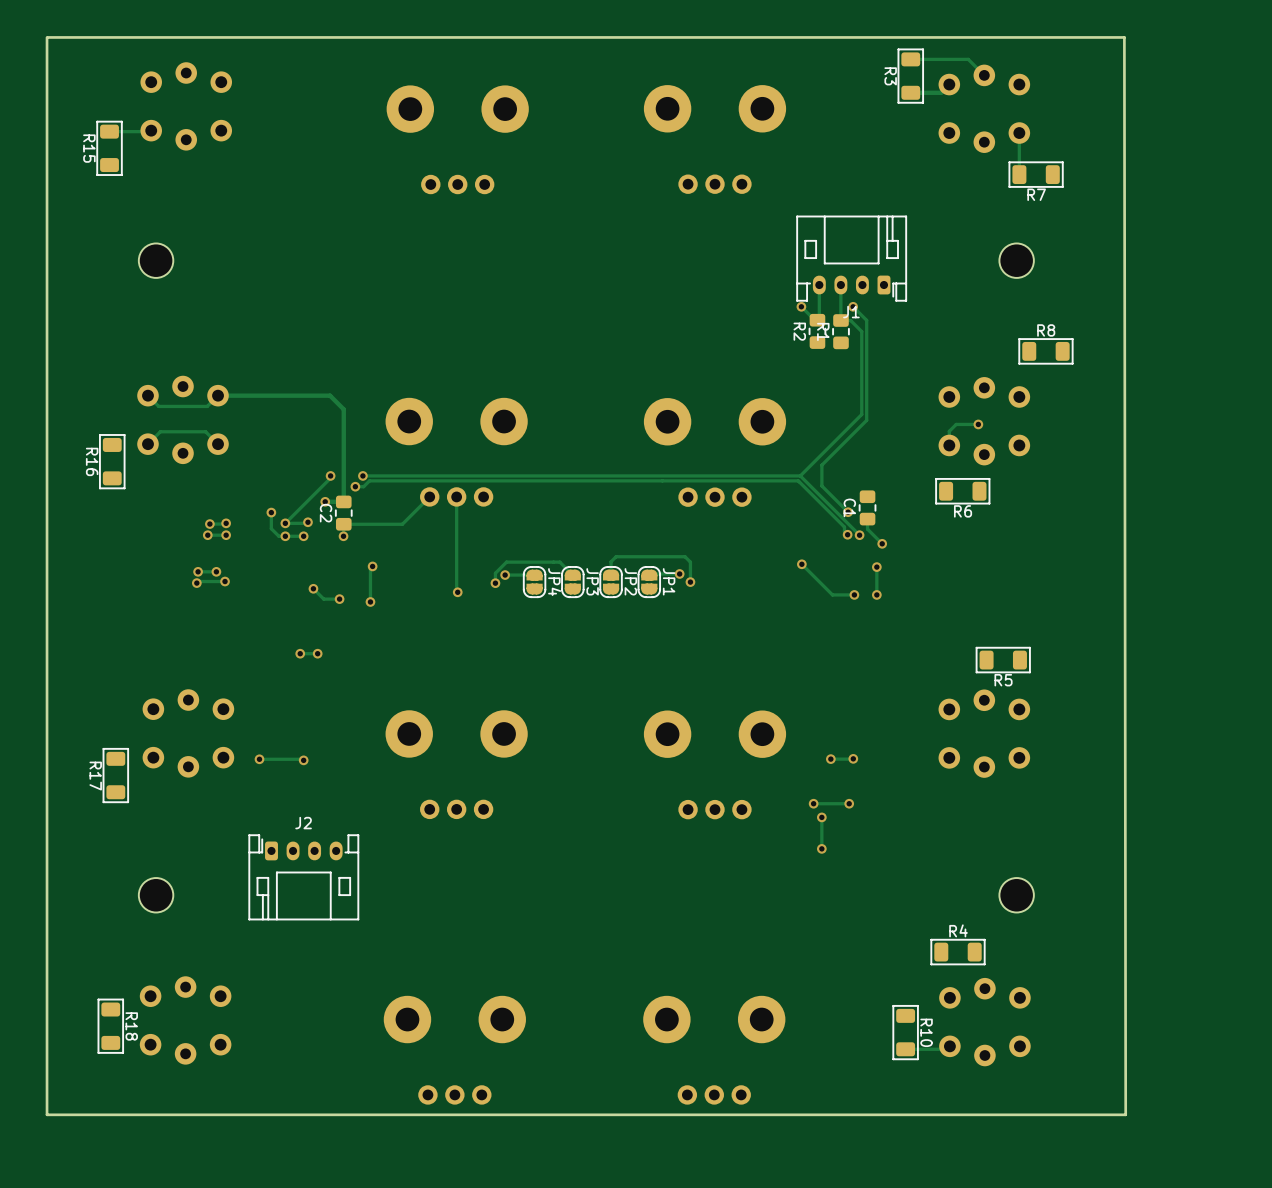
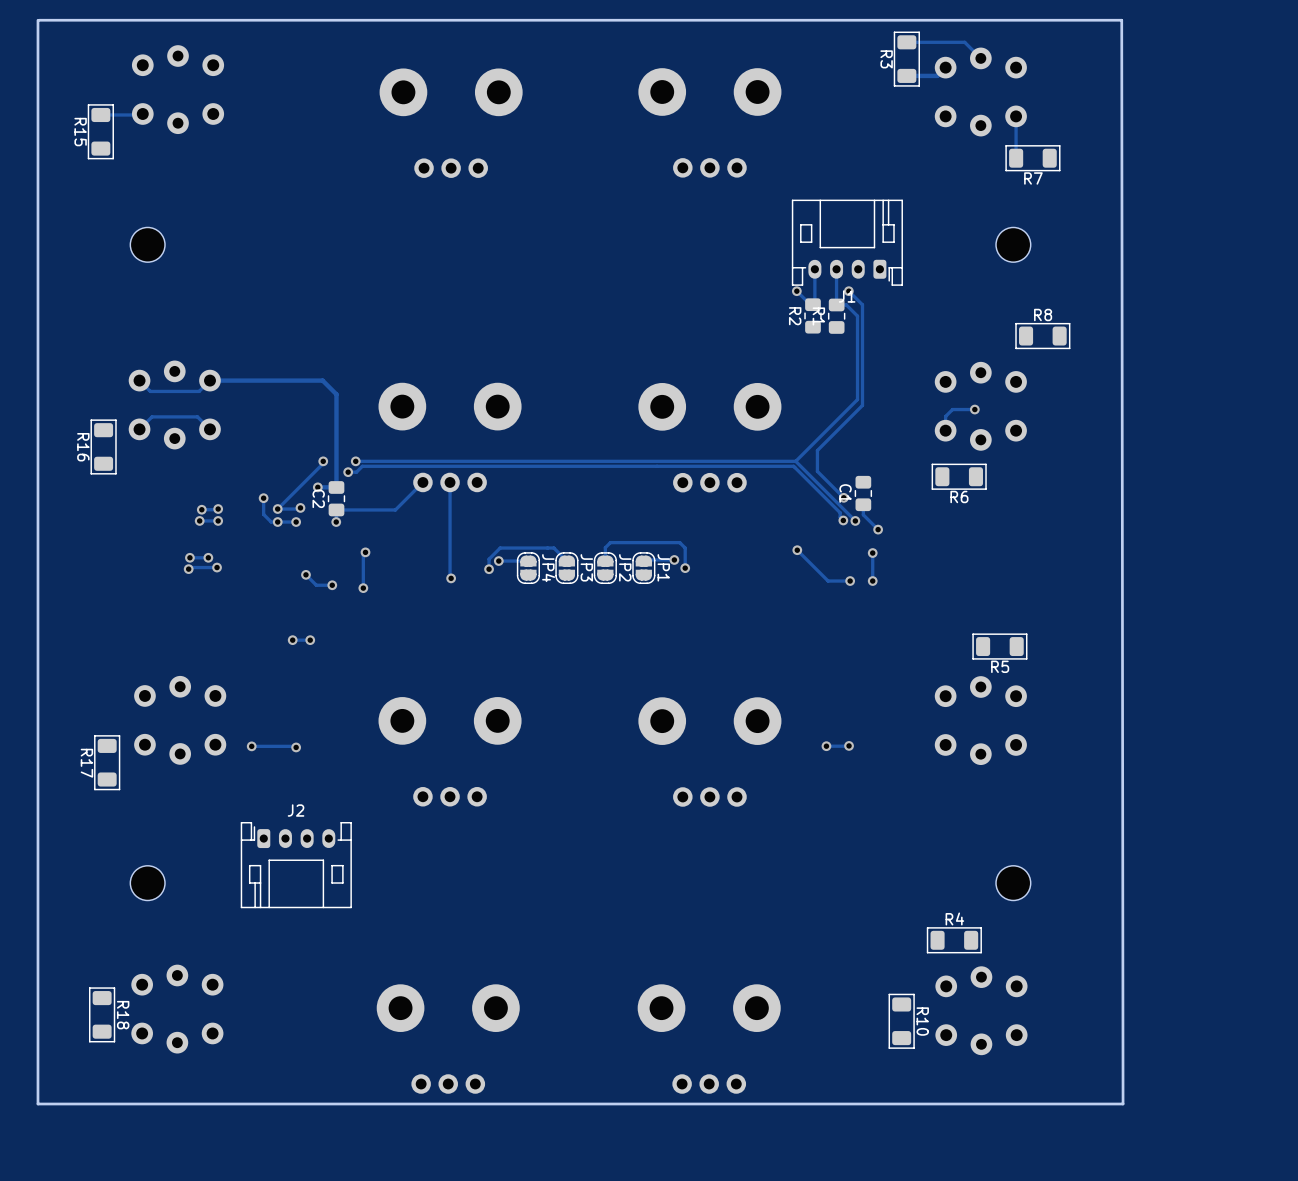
via: (813, 803) -> none
track: (849, 803) (813, 803) -> none
via: (849, 803) -> none
track: (821, 817) (821, 848) -> none
via: (821, 817) -> none
via: (821, 848) -> none
track: (949, 1046) (946, 1049) (905, 1049) -> none

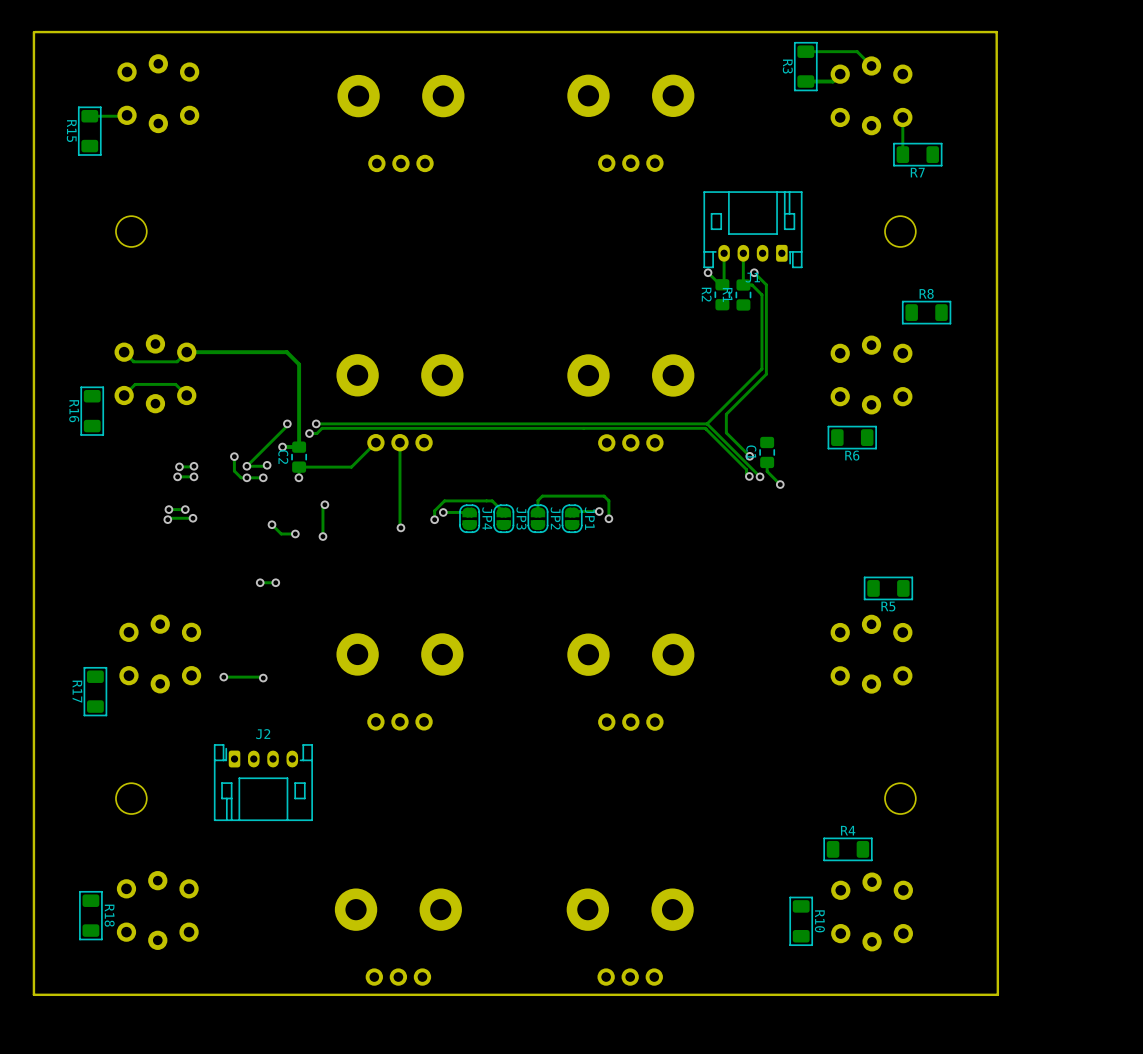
track: (974, 409) (952, 409) (945, 416) (945, 430) -> none
via: (974, 409) -> none
track: (797, 550) (828, 581) (850, 581) -> none
via: (797, 550) -> none
track: (872, 553) (872, 581) -> none
via: (872, 553) -> none
via: (850, 581) -> none
via: (872, 581) -> none
track: (849, 745) (826, 746) -> none
via: (849, 745) -> none
via: (826, 746) -> none

